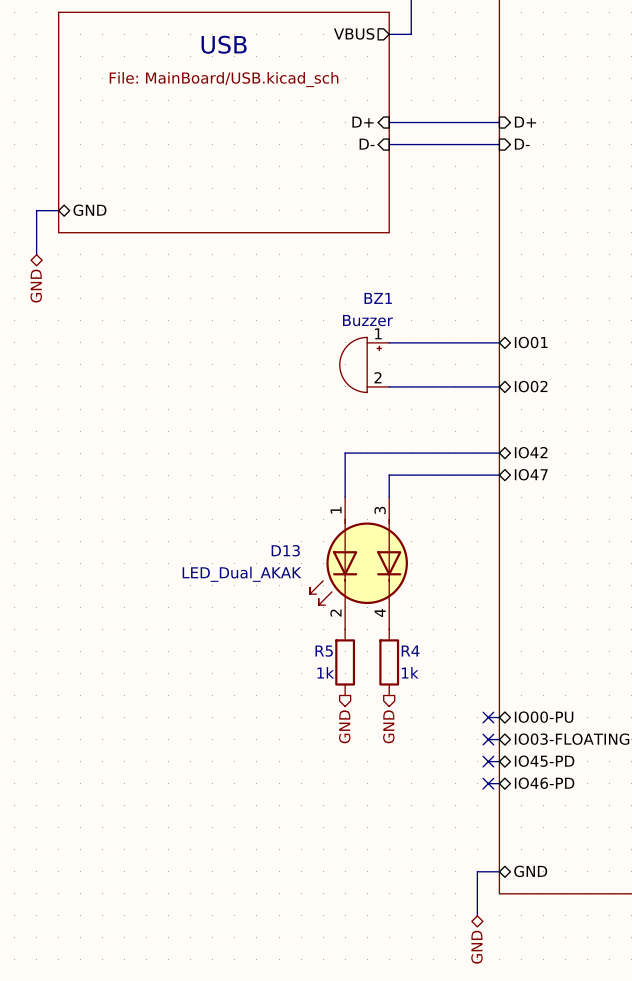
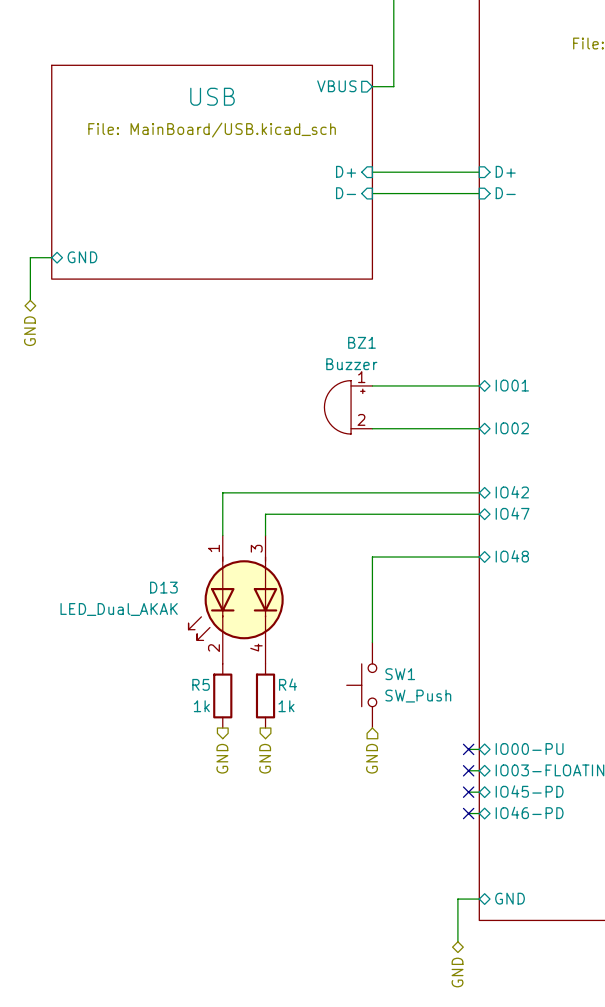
wire: (345, 453) (345, 497) -> (329, 492) (222, 492) (222, 535)
wire: (389, 475) (389, 497) -> (372, 514) (265, 514) (265, 535)
sheet pin: none -> IO48 (512, 556)
wire: none -> (479, 557) (372, 557) (372, 642)
D13 position: (358, 563) -> (236, 599)
SW1: none -> SW_Push (361, 685)
R5 position: (345, 662) -> (222, 695)
R4 position: (389, 662) -> (265, 695)
hierarchical label: none -> GND (222, 758)
hierarchical label: none -> GND (265, 758)
hierarchical label: GND (344, 726) -> none
hierarchical label shape: output (388, 726) -> input (372, 758)

